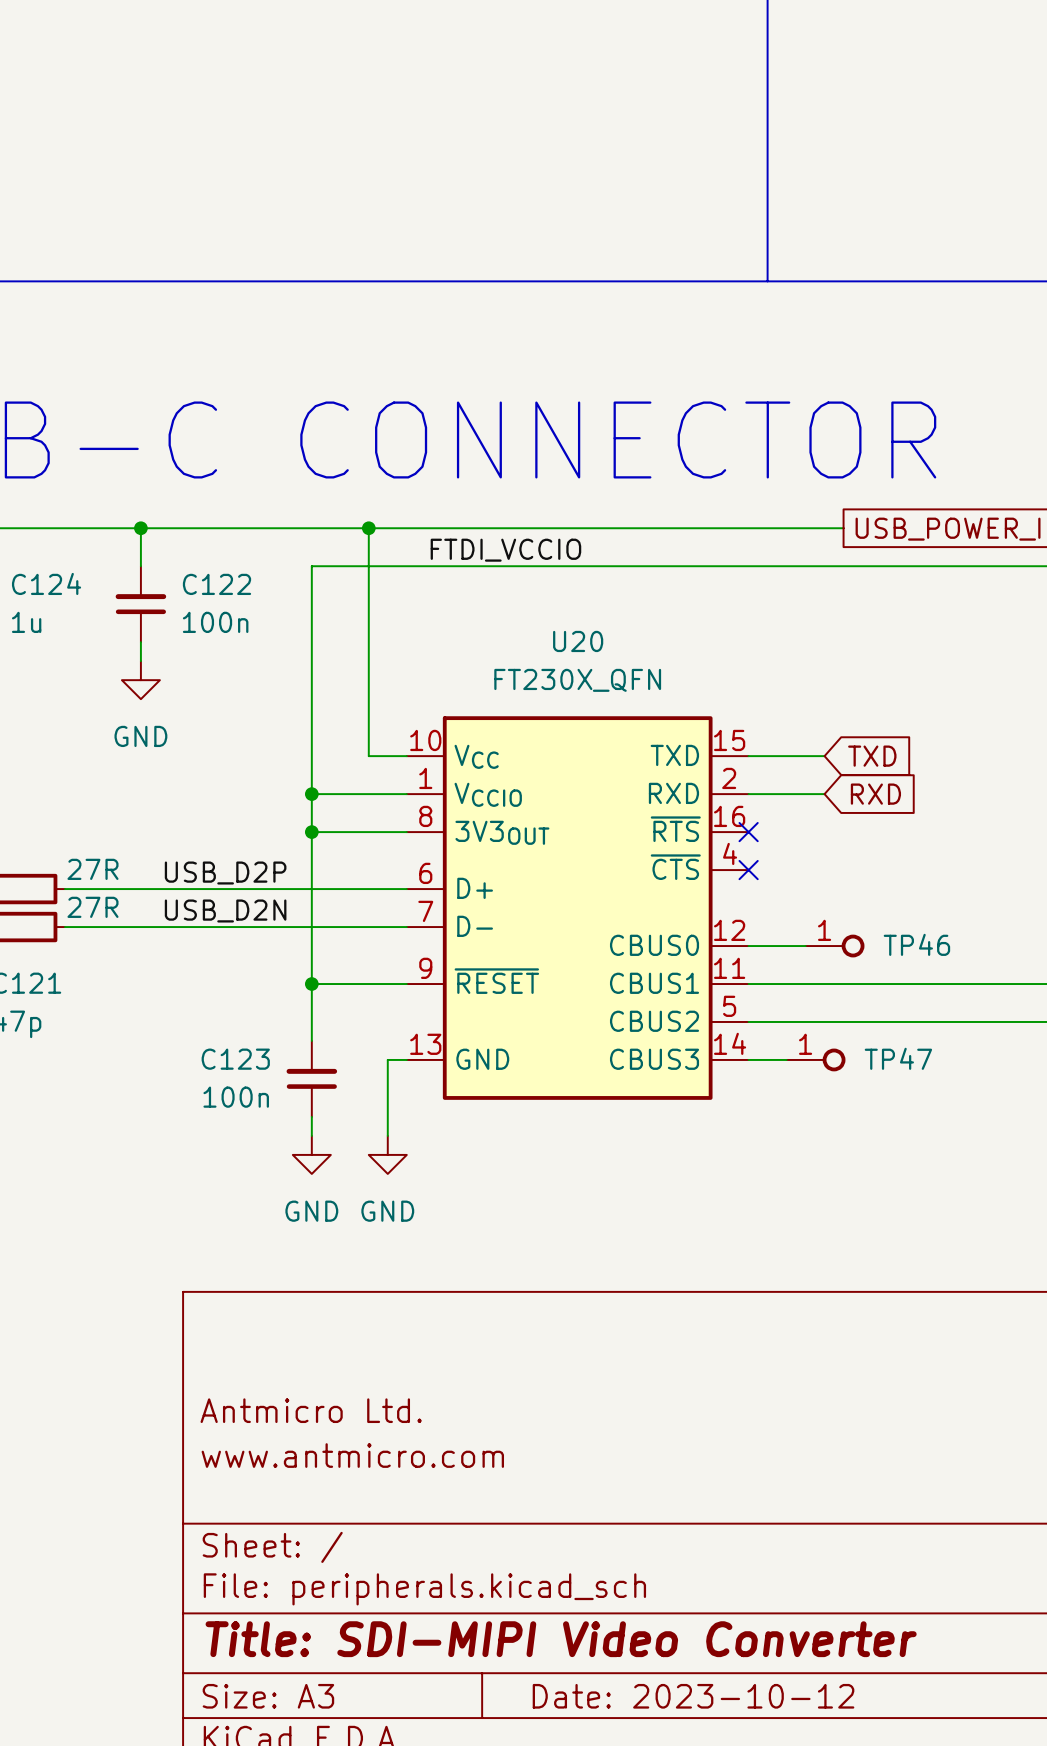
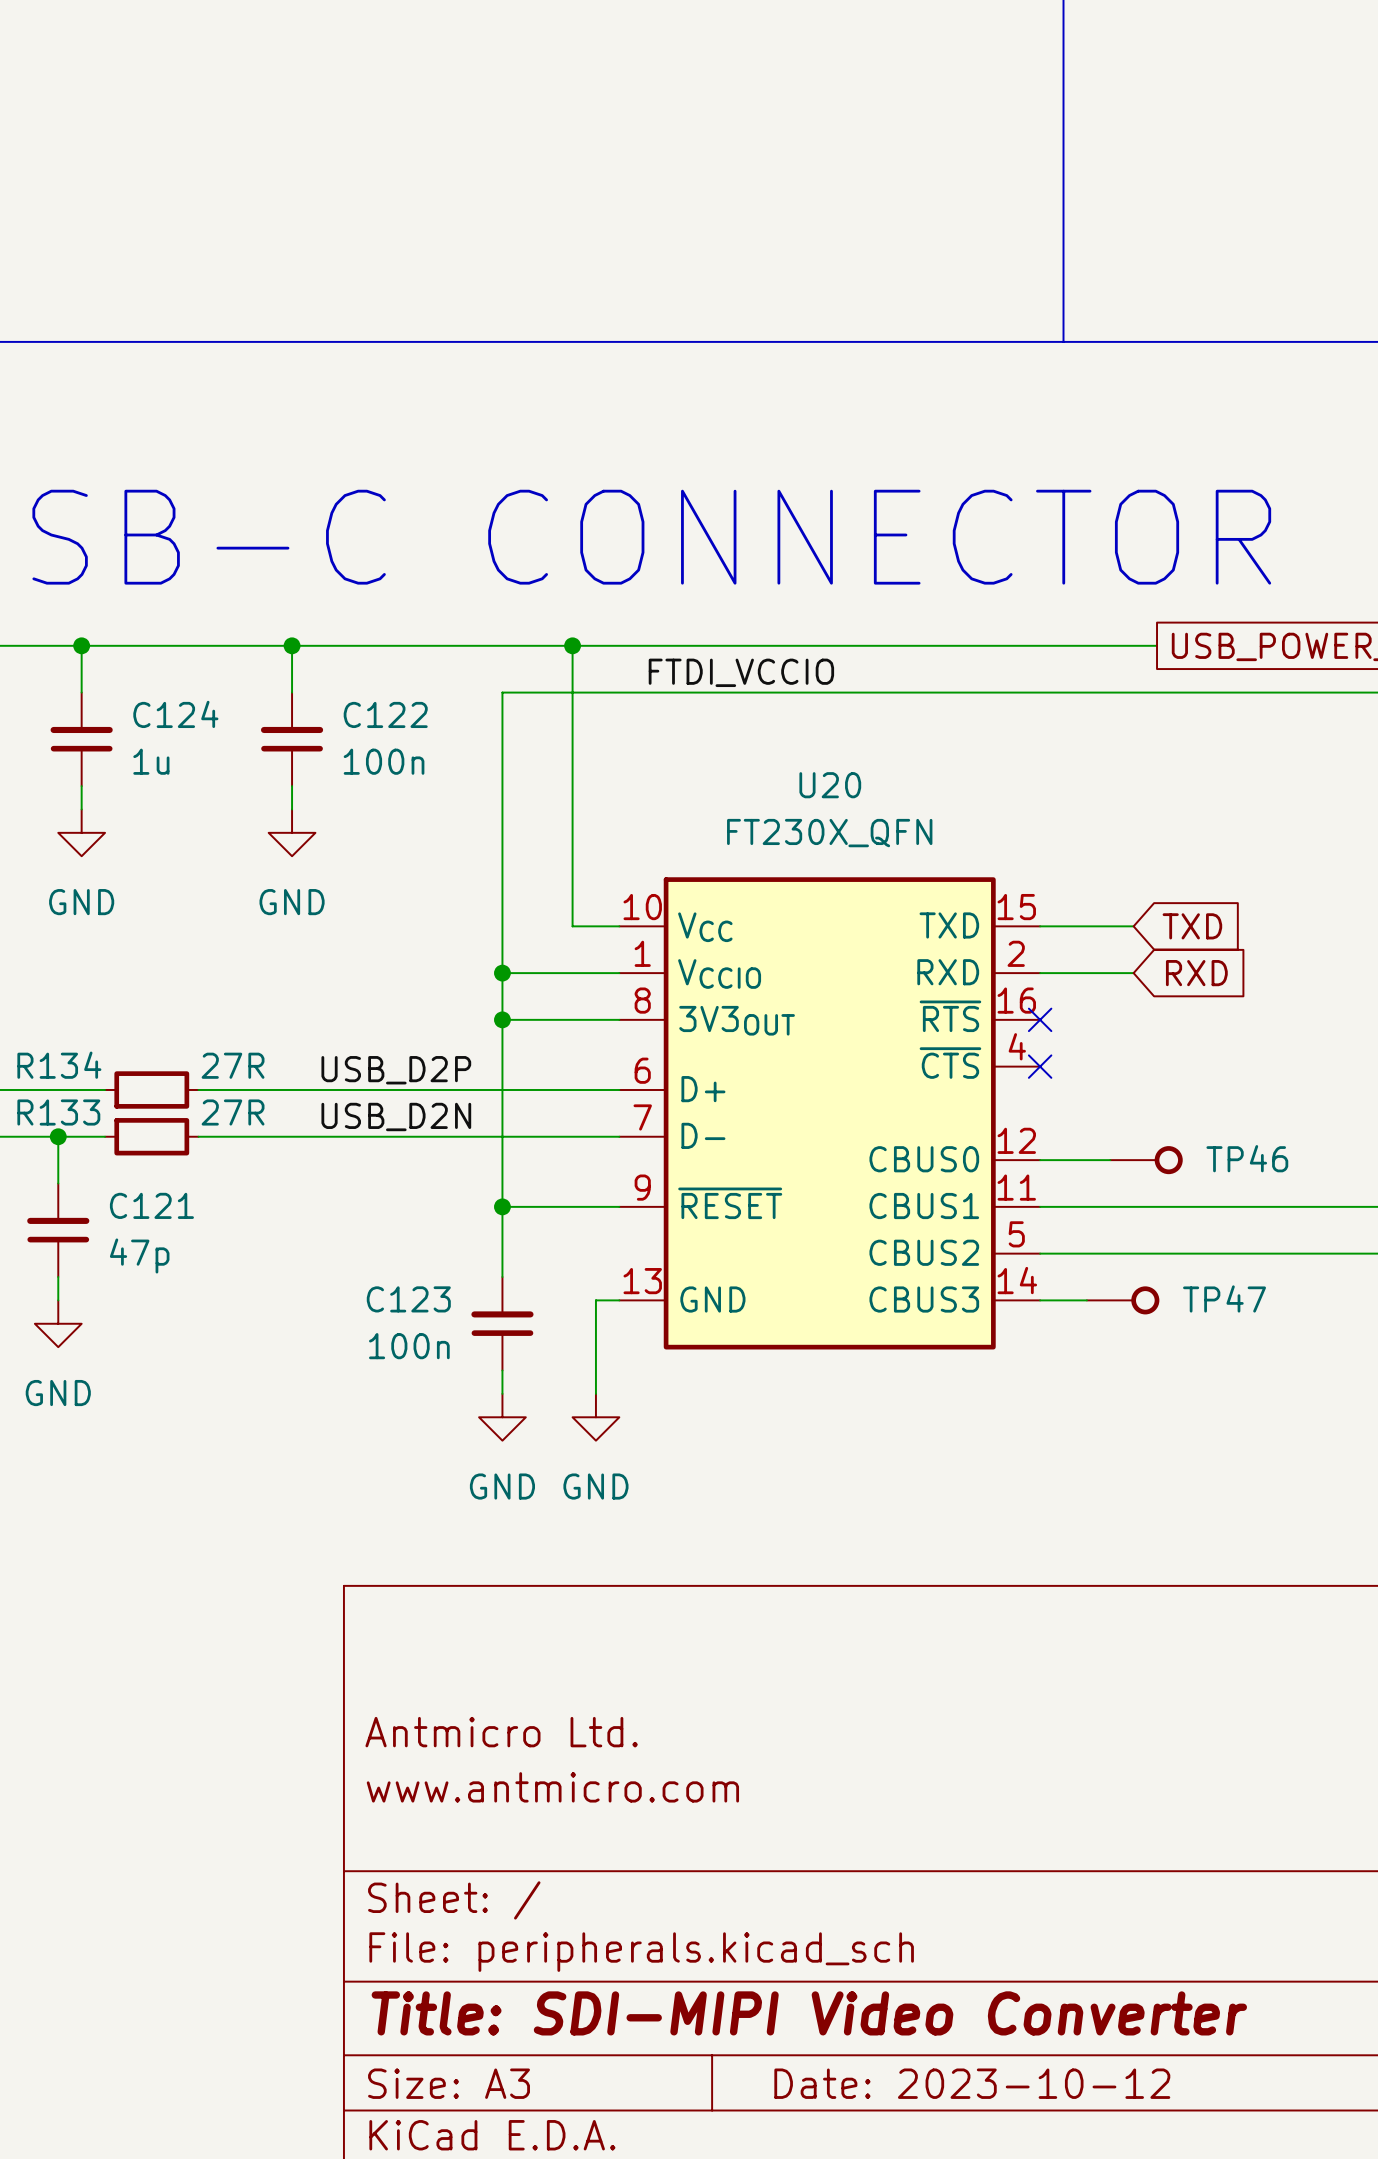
TP46 pin number: 1 (824, 930) -> none
TP47 pin number: 1 (805, 1044) -> none

